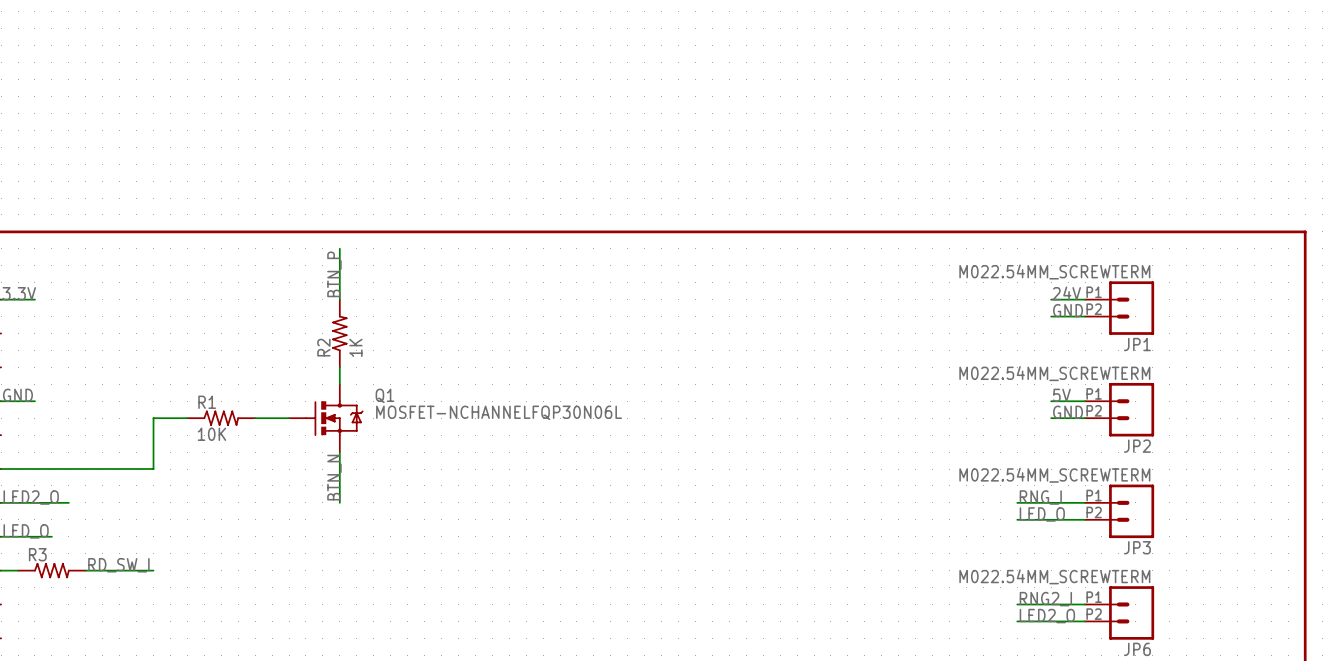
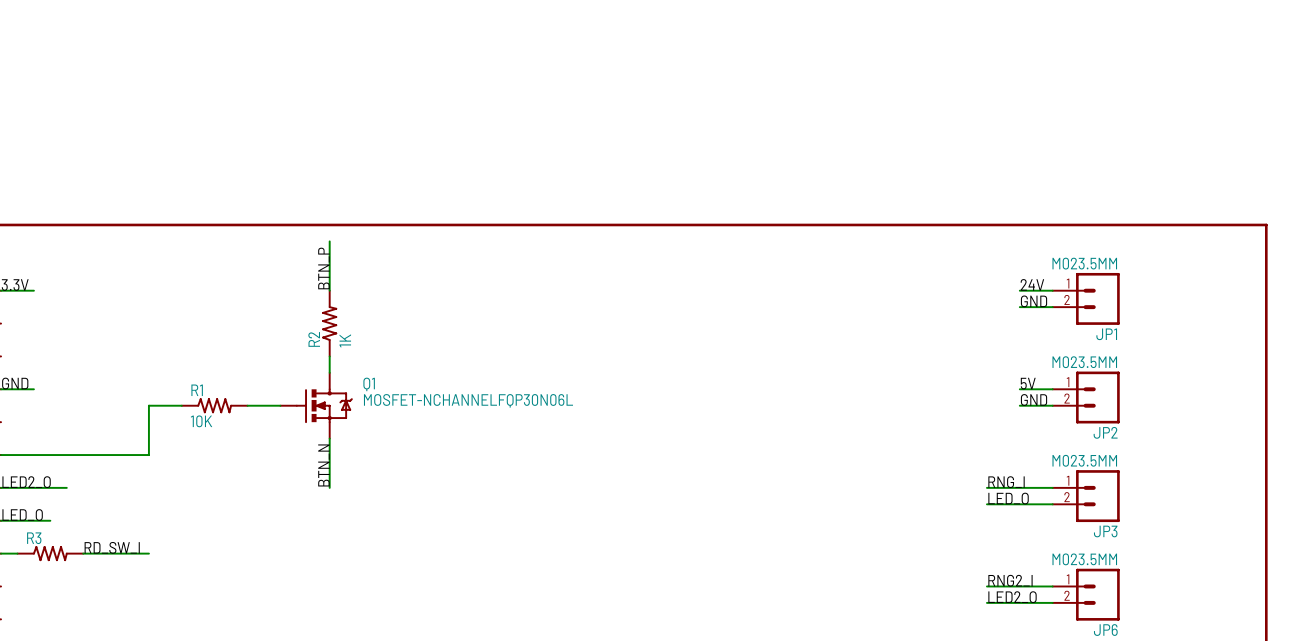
JP1 value: M022.54MM_SCREWTERM (1054, 271) -> M023.5MM (1084, 263)
JP1 pin number: P1 (1094, 292) -> 1 (1068, 283)
JP1 pin number: P2 (1094, 309) -> 2 (1067, 299)
JP2 value: M022.54MM_SCREWTERM (1054, 373) -> M023.5MM (1084, 362)
JP2 pin number: P1 (1094, 393) -> 1 (1068, 382)
JP2 pin number: P2 (1094, 410) -> 2 (1067, 398)
JP3 value: M022.54MM_SCREWTERM (1054, 475) -> M023.5MM (1084, 460)
JP3 pin number: P1 (1094, 495) -> 1 (1068, 480)
JP3 pin number: P2 (1094, 512) -> 2 (1067, 497)
JP6 value: M022.54MM_SCREWTERM (1054, 576) -> M023.5MM (1084, 559)
JP6 pin number: P1 (1094, 597) -> 1 (1068, 579)
JP6 pin number: P2 (1094, 614) -> 2 (1067, 595)

